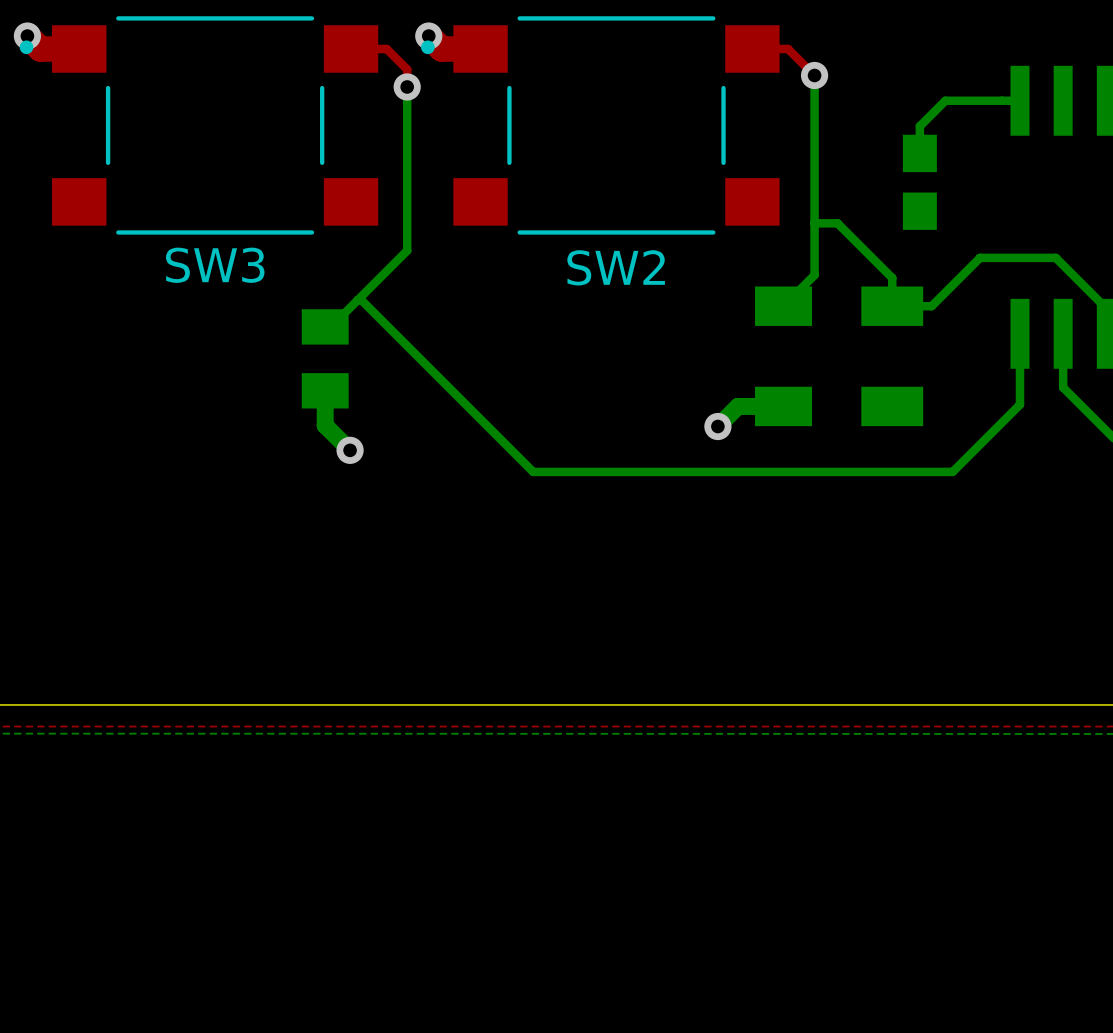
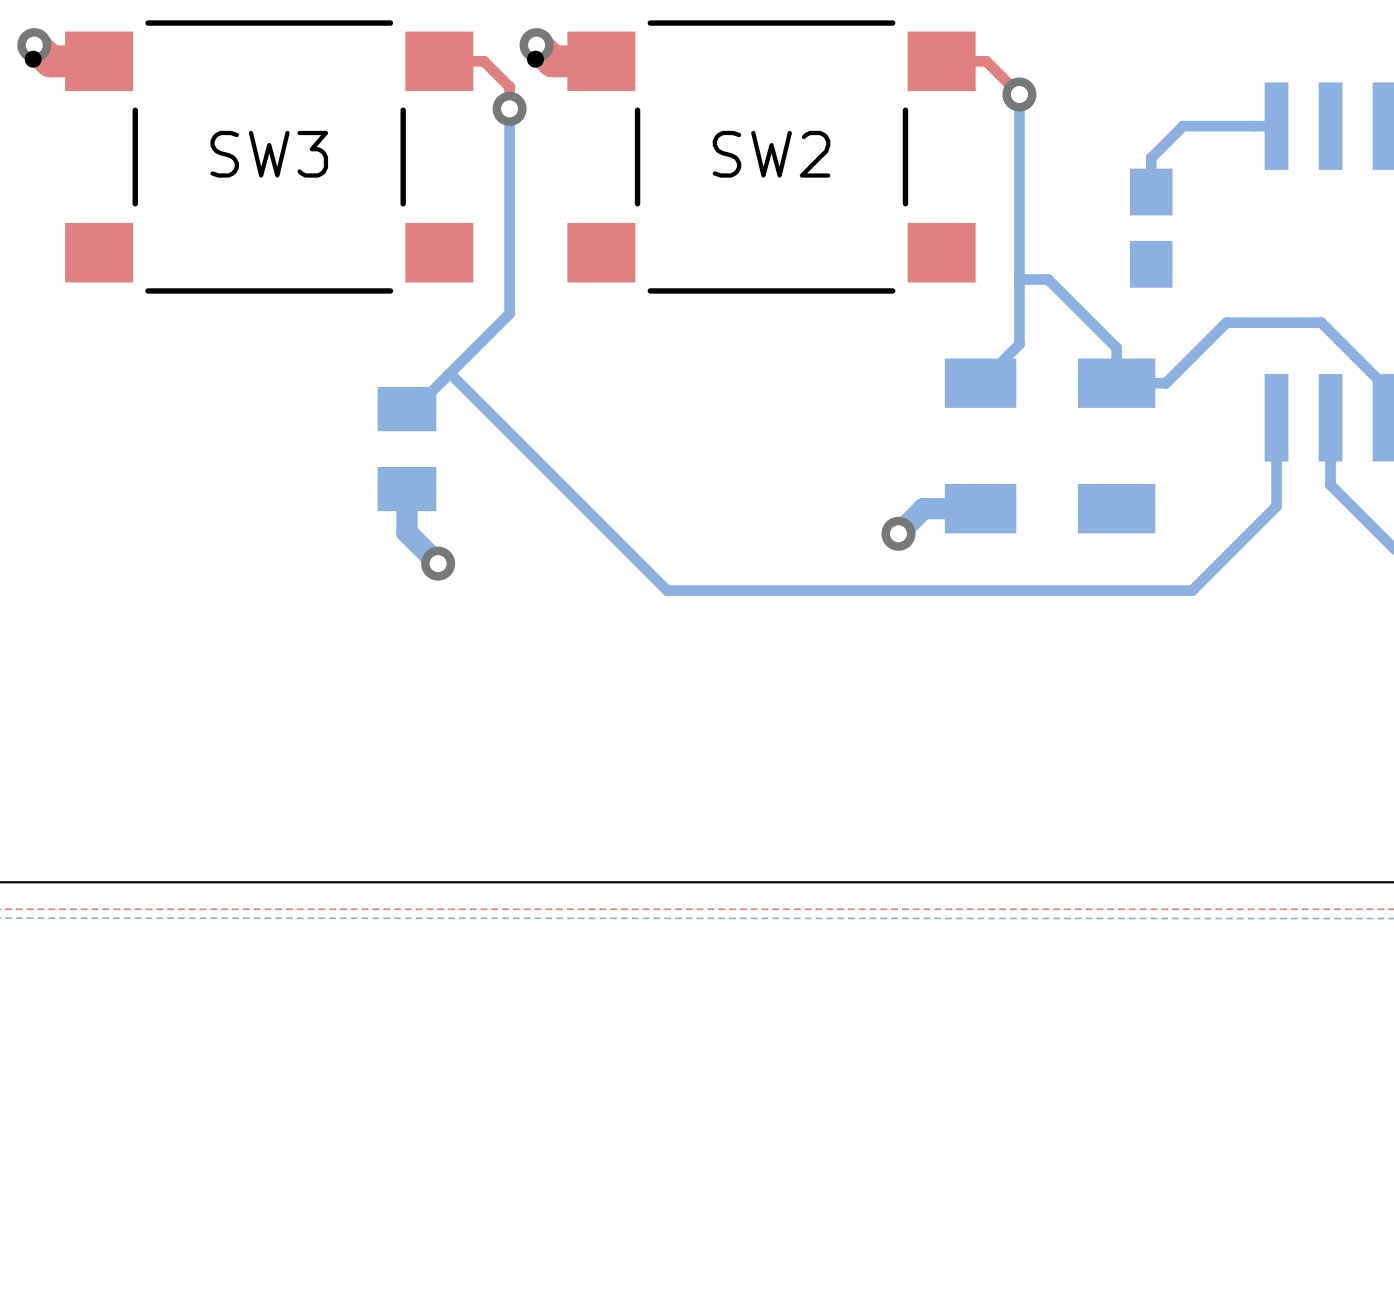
SW3 name position: SW3 (215, 265) -> SW3 (269, 154)
SW2 name position: SW2 (616, 267) -> SW2 (771, 154)

